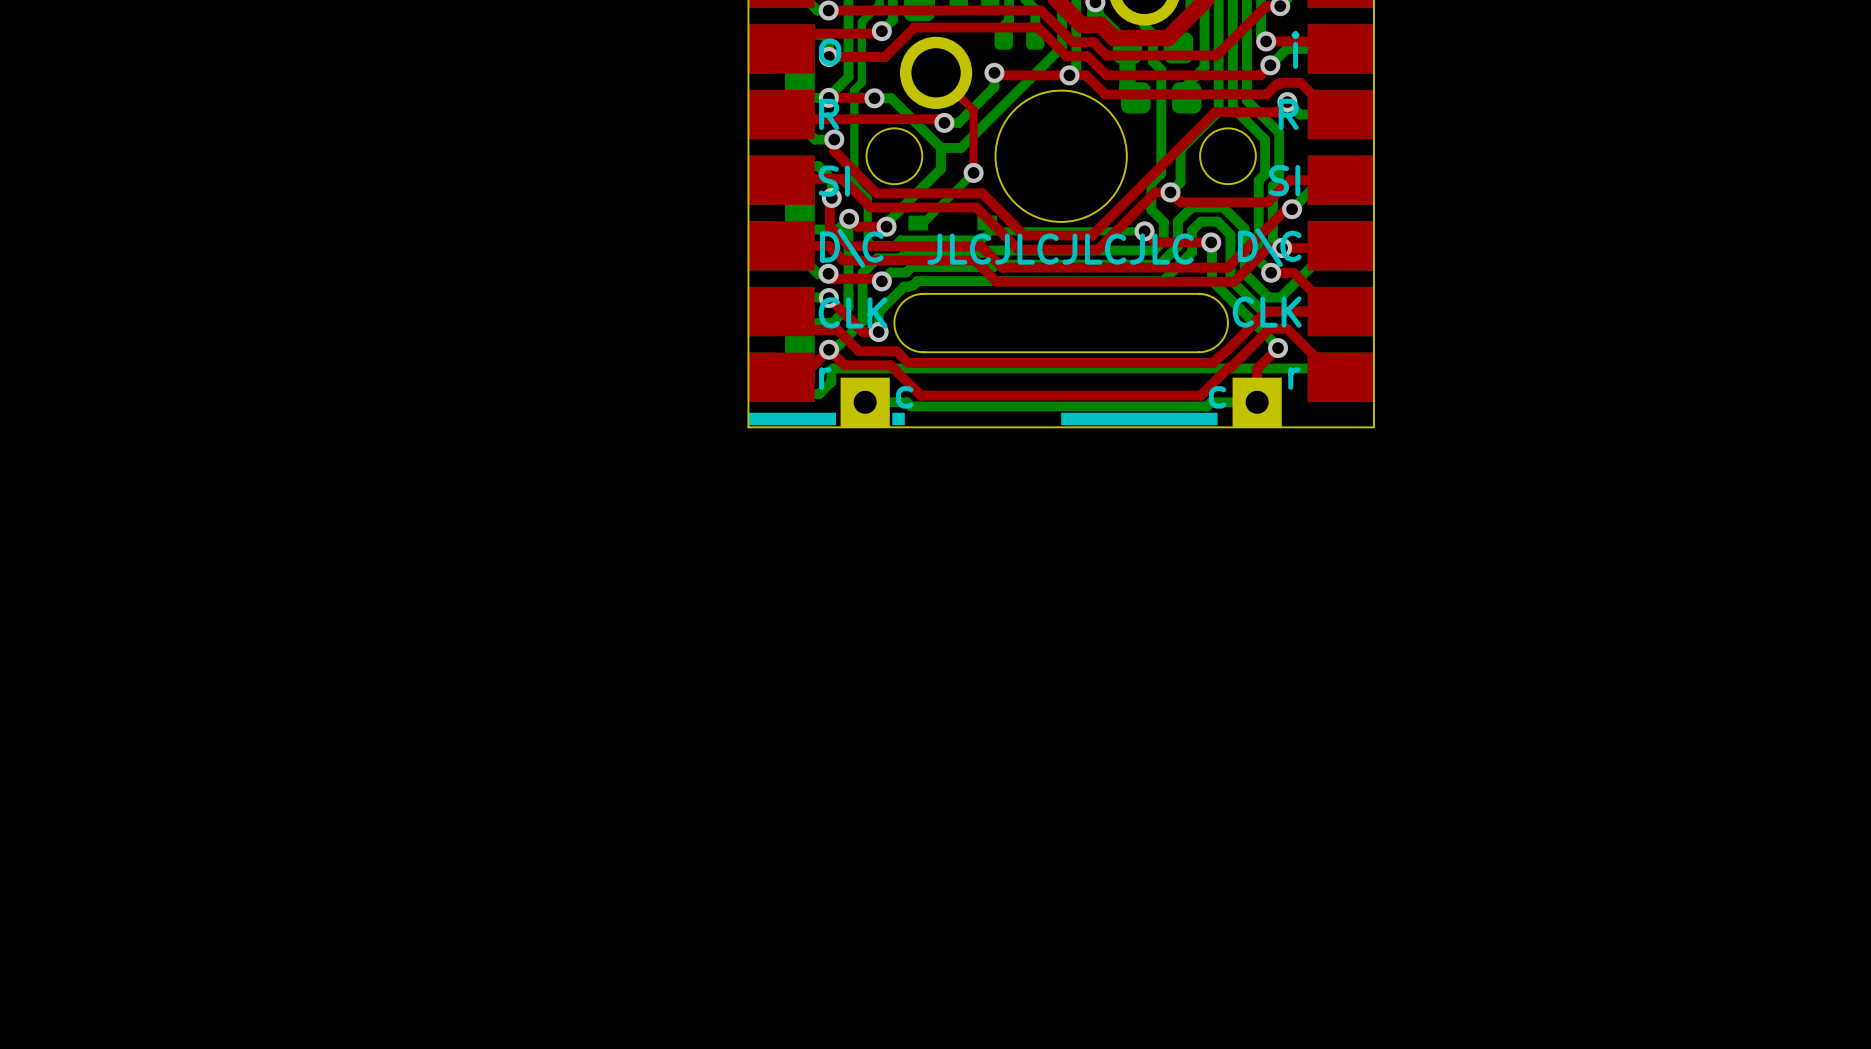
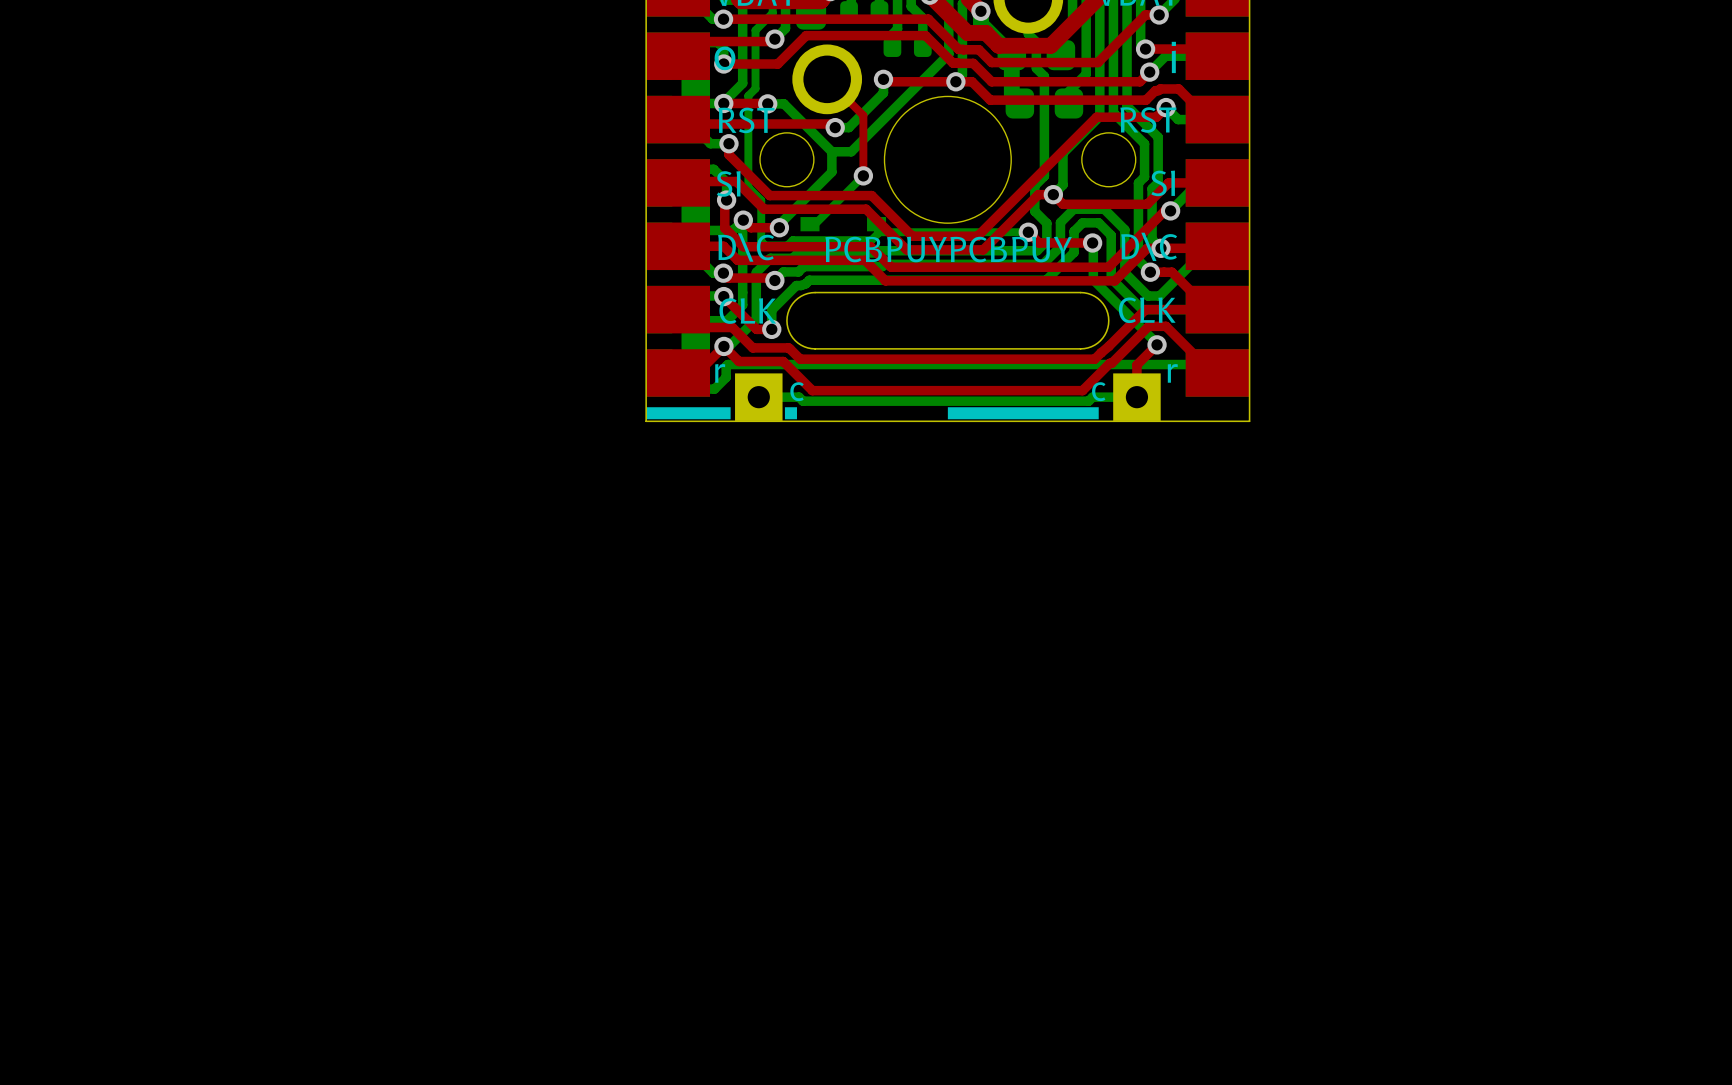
text: R (829, 114) -> RST (746, 120)
text: R (1288, 114) -> RST (1148, 120)
text: JLCJLCJLCJLC (1060, 249) -> PCBPUYPCBPUY (948, 249)

